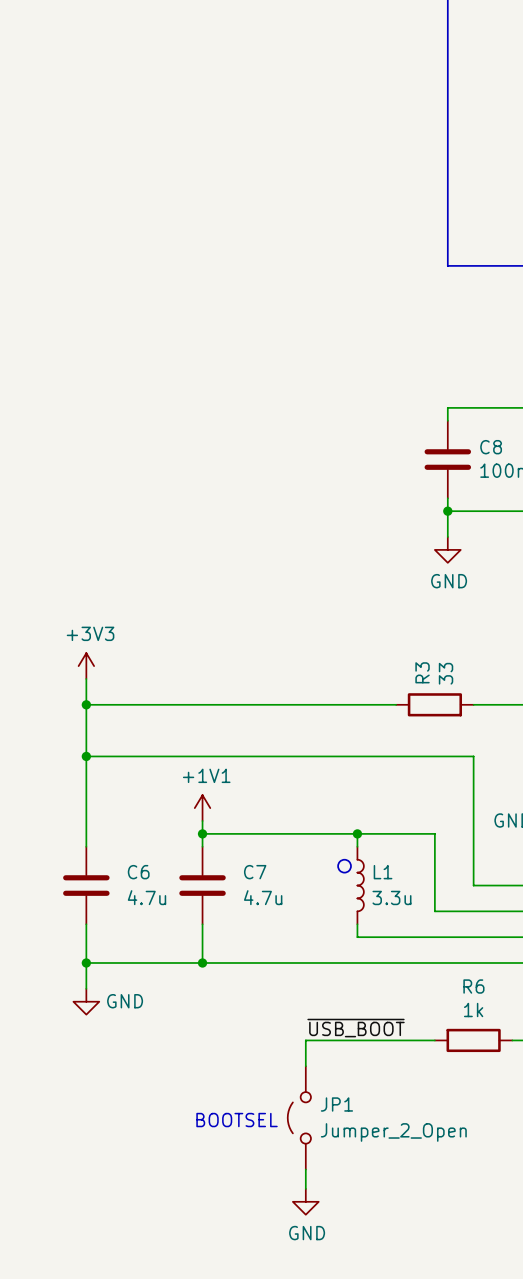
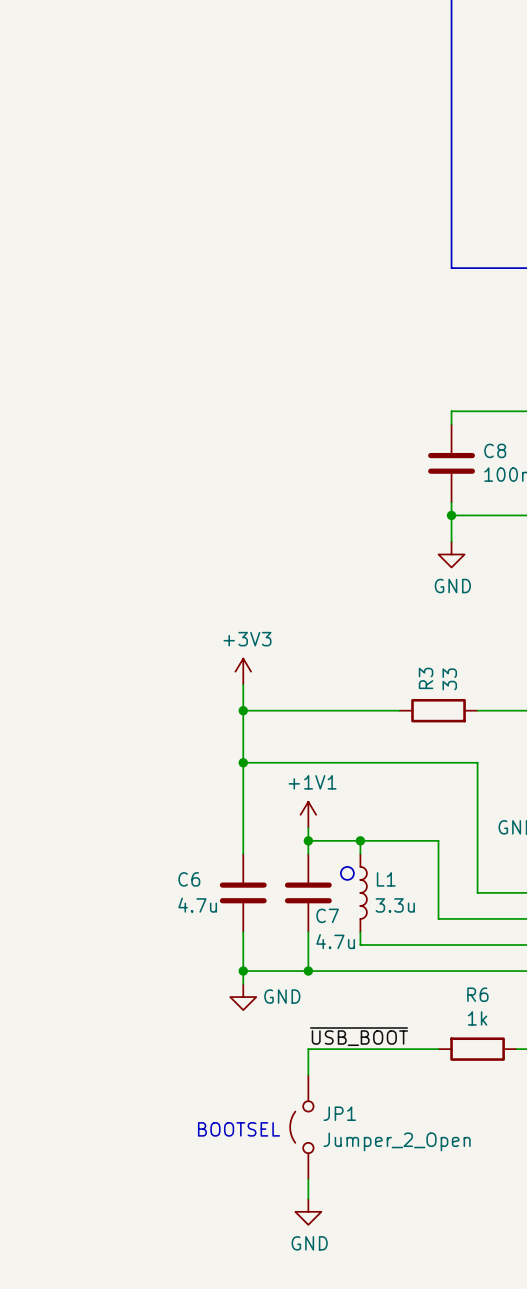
power symbol position: +3V3 (86, 666) -> +3V3 (243, 671)
wire: (86, 678) (86, 846) -> (243, 684) (243, 853)
wire: (86, 704) (241, 704) -> none
junction: (86, 704) -> none
junction: none -> (243, 710)
wire: (86, 756) (241, 756) -> none
junction: (86, 756) -> none
junction: none -> (243, 762)
power symbol position: +1V1 (202, 808) -> +1V1 (308, 814)
wire: (202, 820) (202, 846) -> (308, 827) (308, 853)
wire: (202, 833) (305, 833) -> none
junction: (202, 833) -> none
junction: none -> (308, 840)
C6 name position: C6 (138, 872) -> C6 (189, 879)
C7 name position: C7 (255, 872) -> C7 (327, 915)
C6 position: (86, 885) -> (243, 892)
C7 position: (202, 885) -> (308, 892)
C6 value position: 4.7u (147, 897) -> 4.7u (197, 905)
C7 value position: 4.7u (263, 897) -> 4.7u (335, 941)
wire: (86, 924) (86, 988) -> none
wire: (202, 924) (202, 962) -> (308, 931) (308, 971)
wire: none -> (243, 931) (243, 984)
wire: (86, 962) (241, 962) -> none
junction: (86, 962) -> none
junction position: (202, 962) -> (243, 971)
junction: none -> (308, 971)
power symbol position: GND (86, 1001) -> GND (243, 997)

